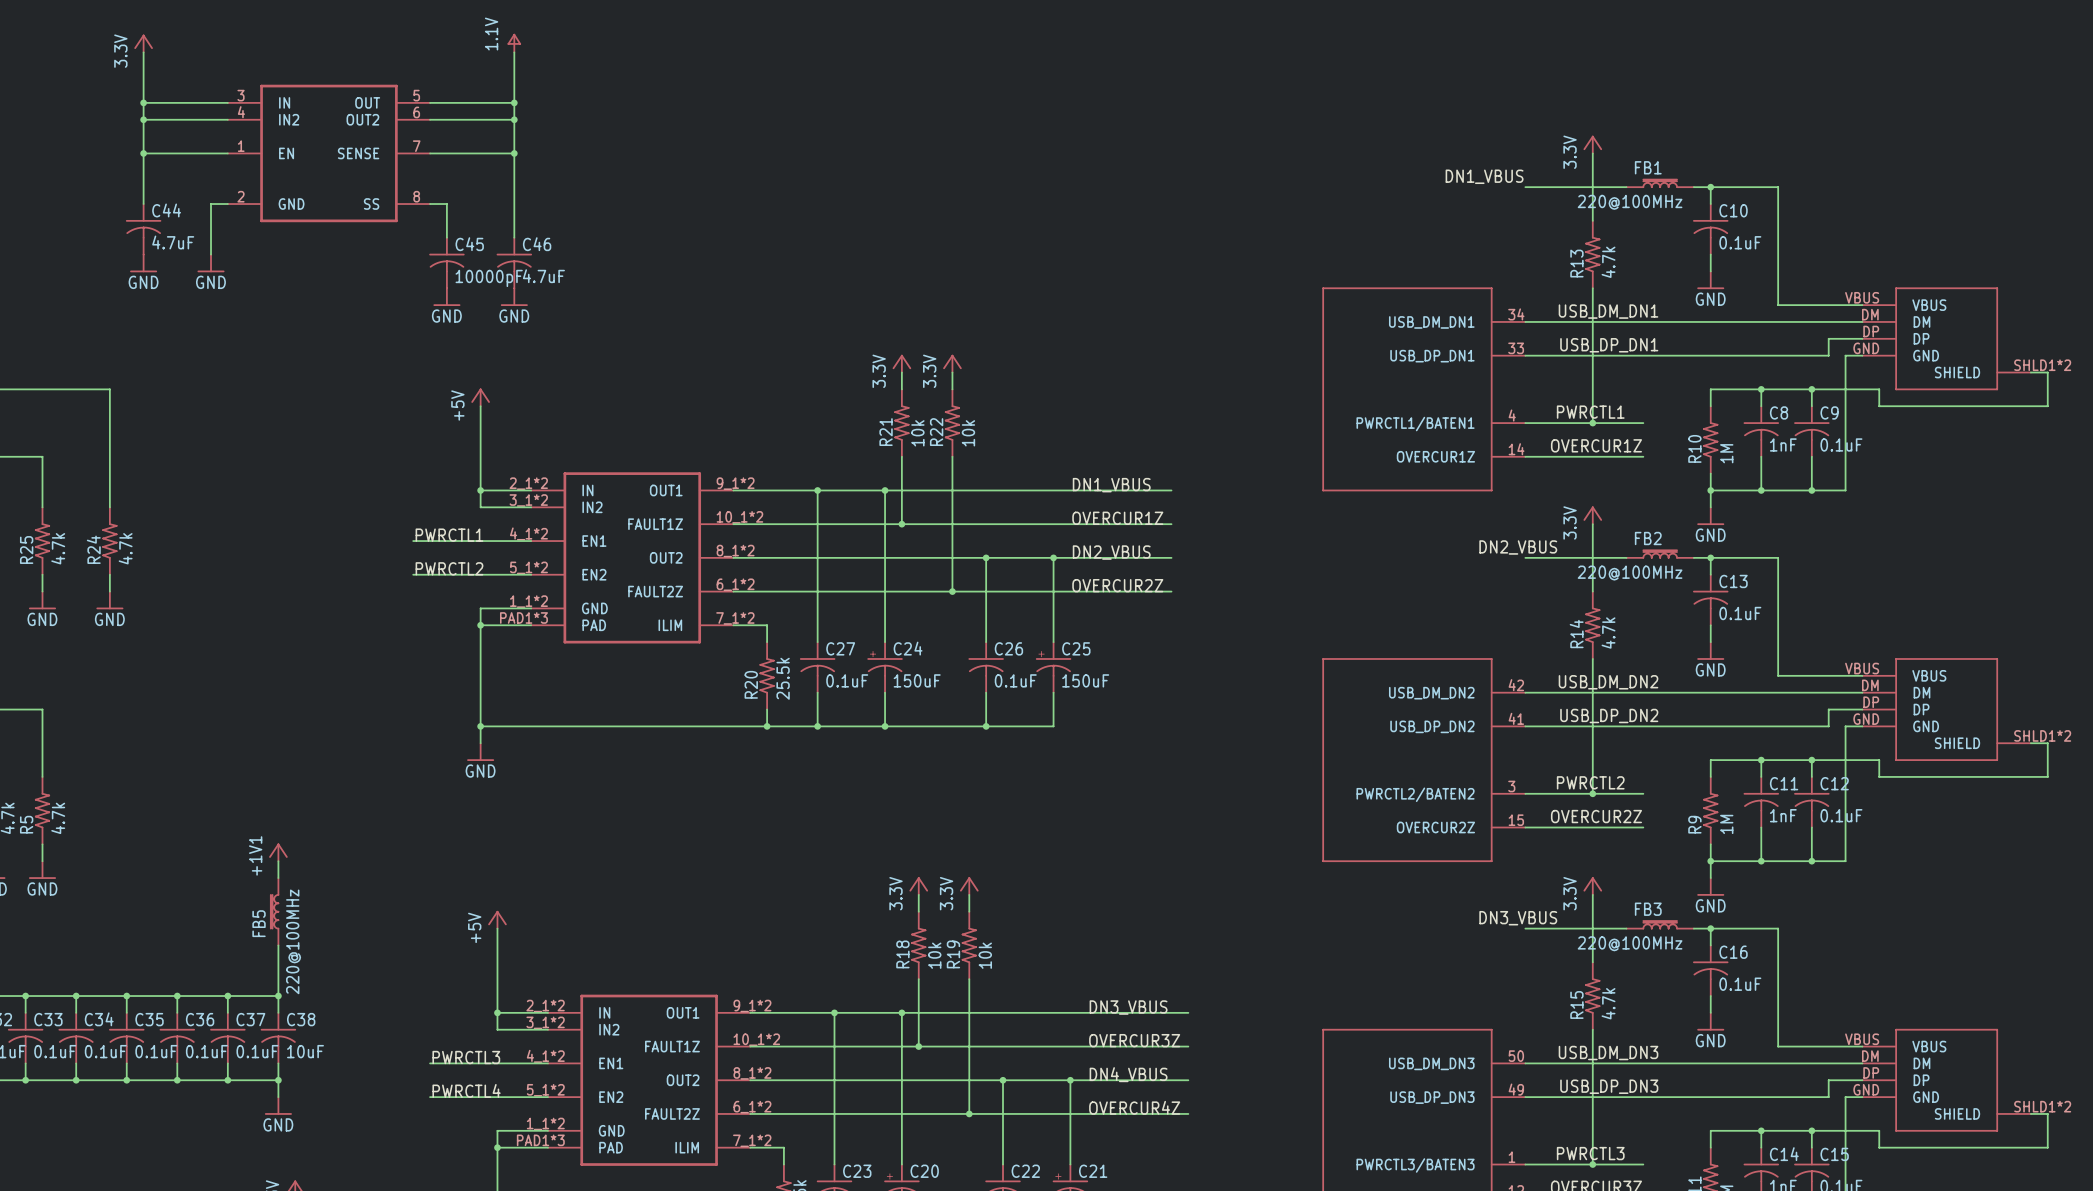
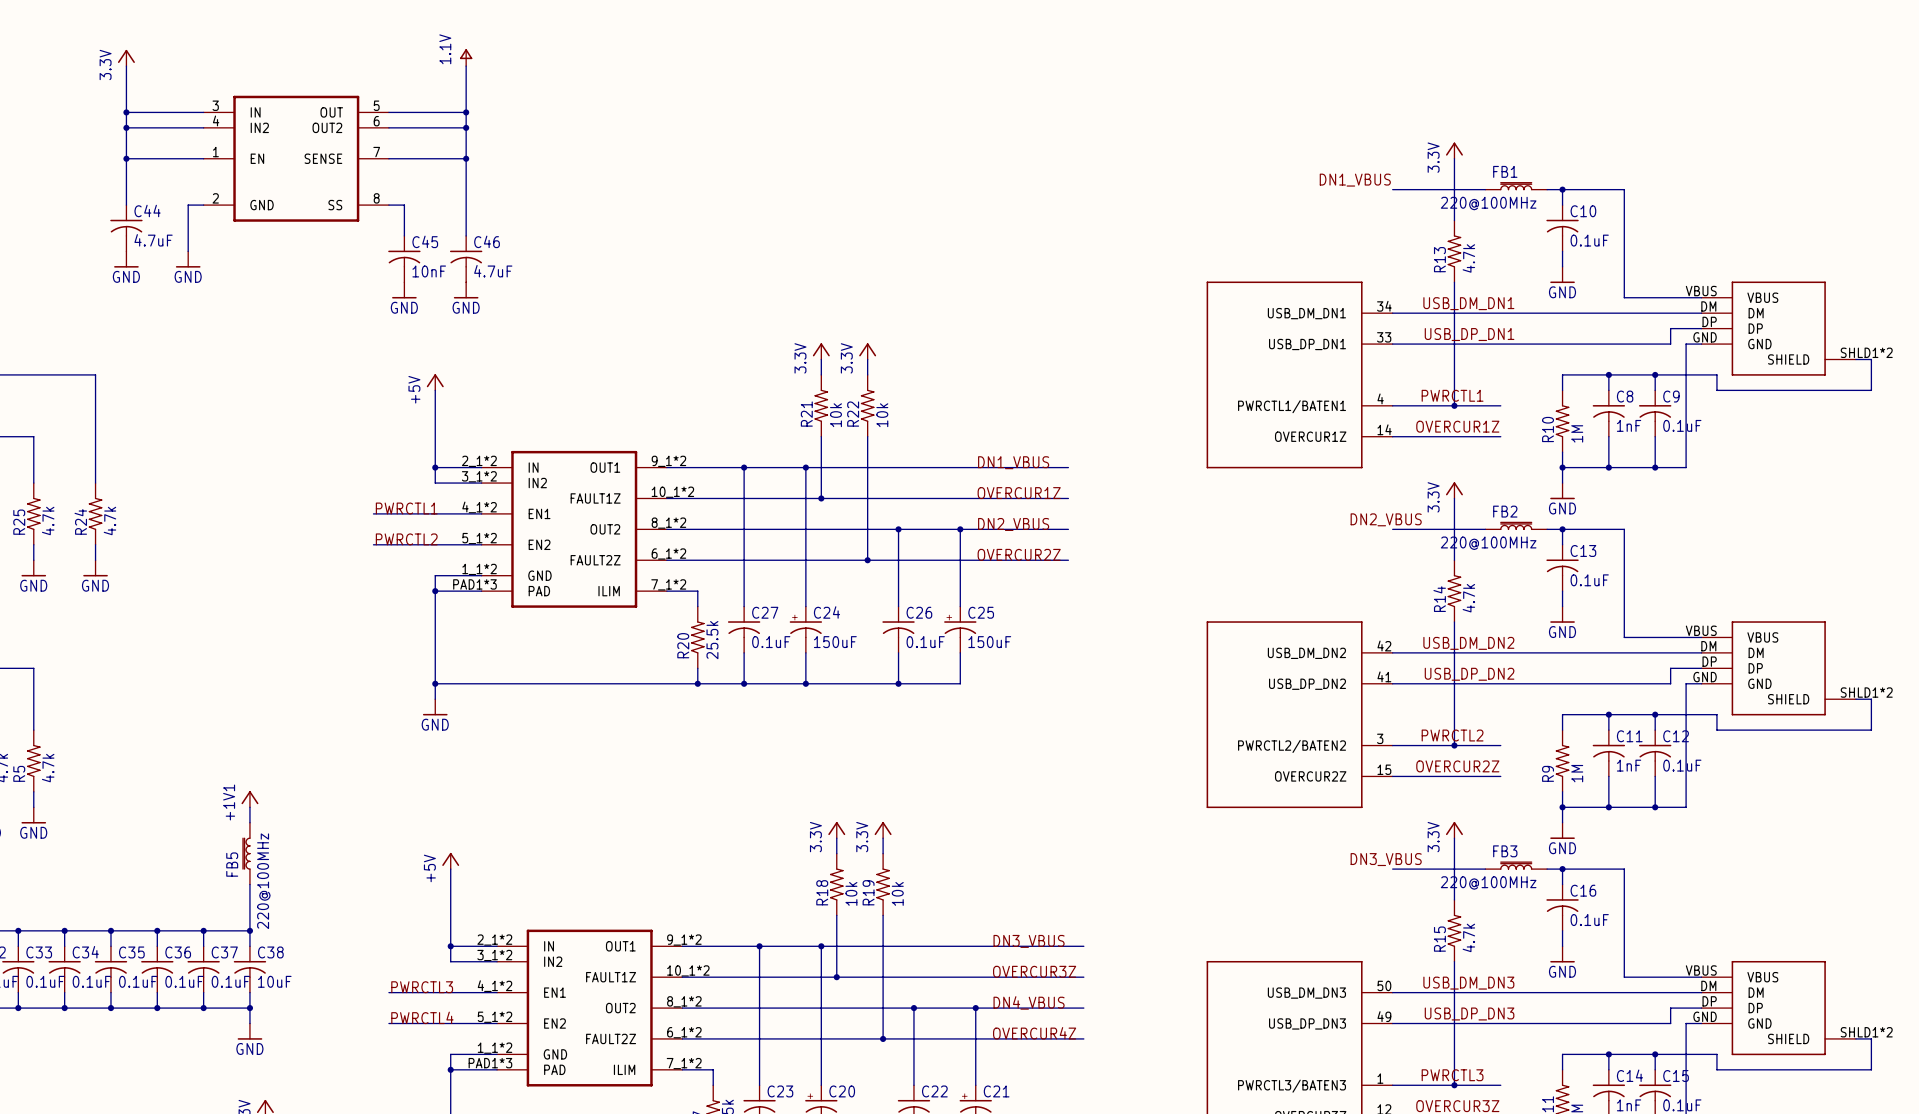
C45 value: 10000pF (489, 278) -> 10nF (429, 271)

